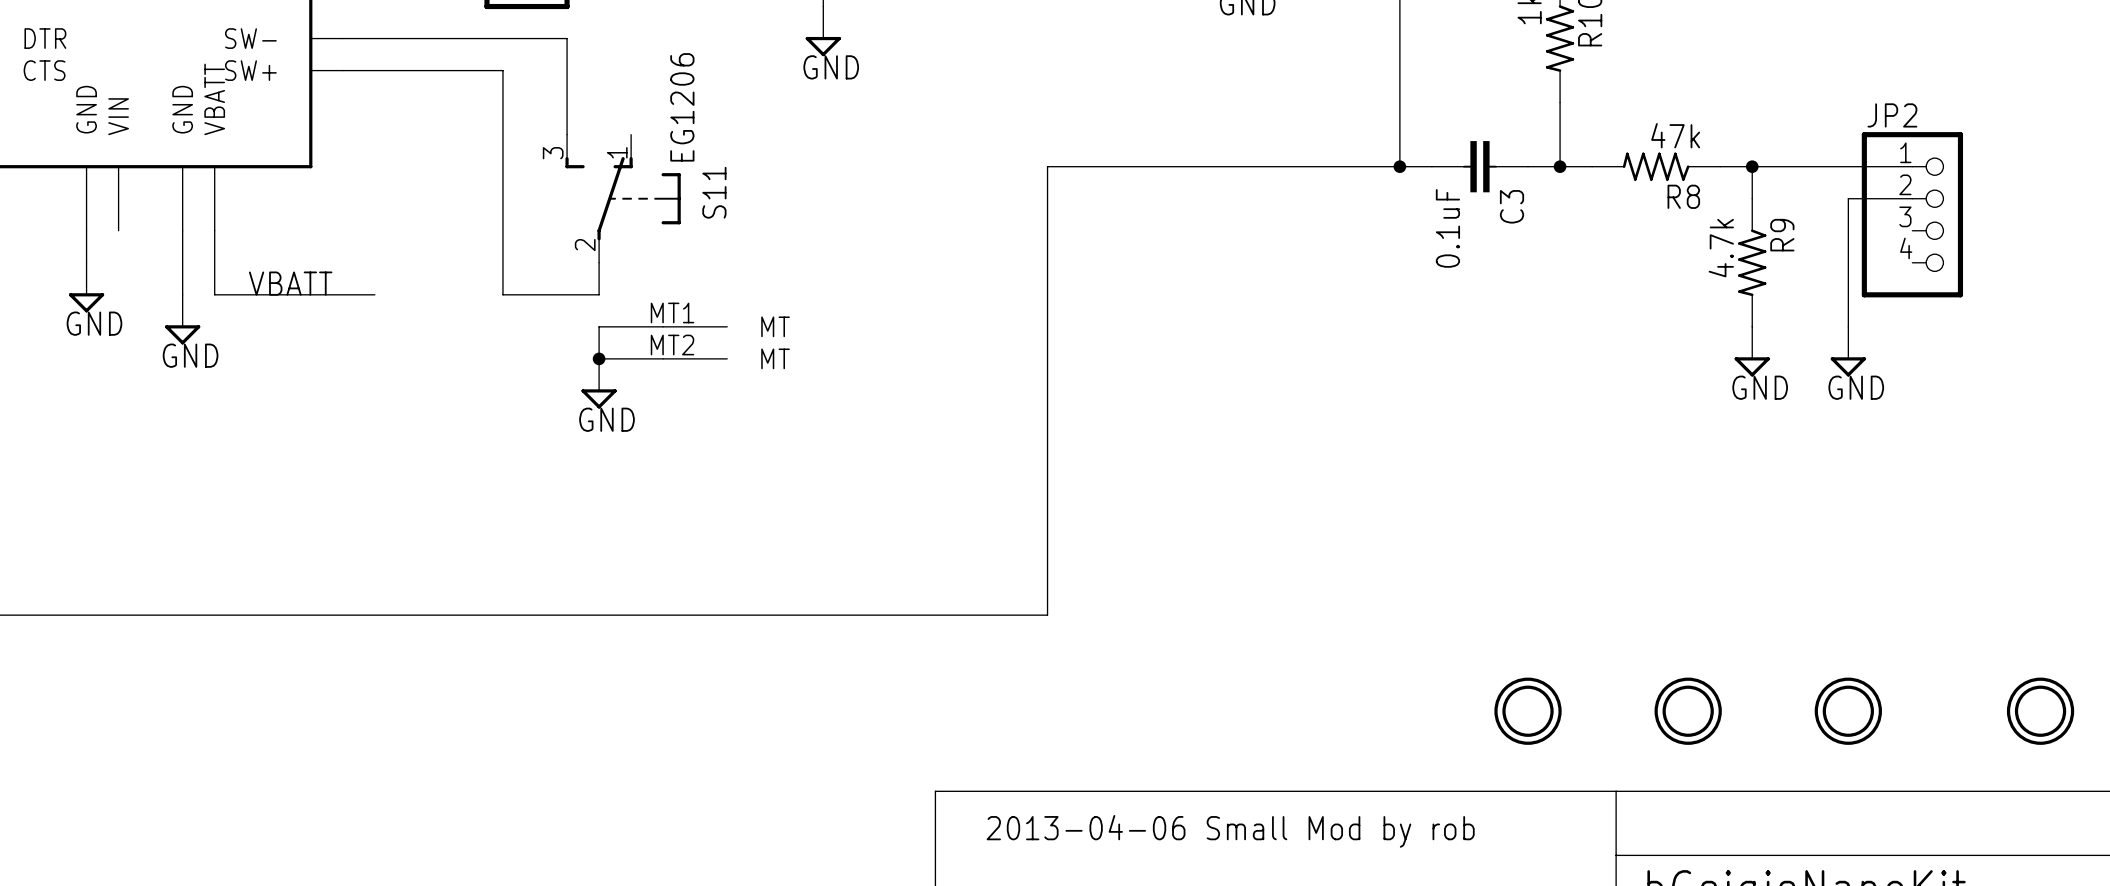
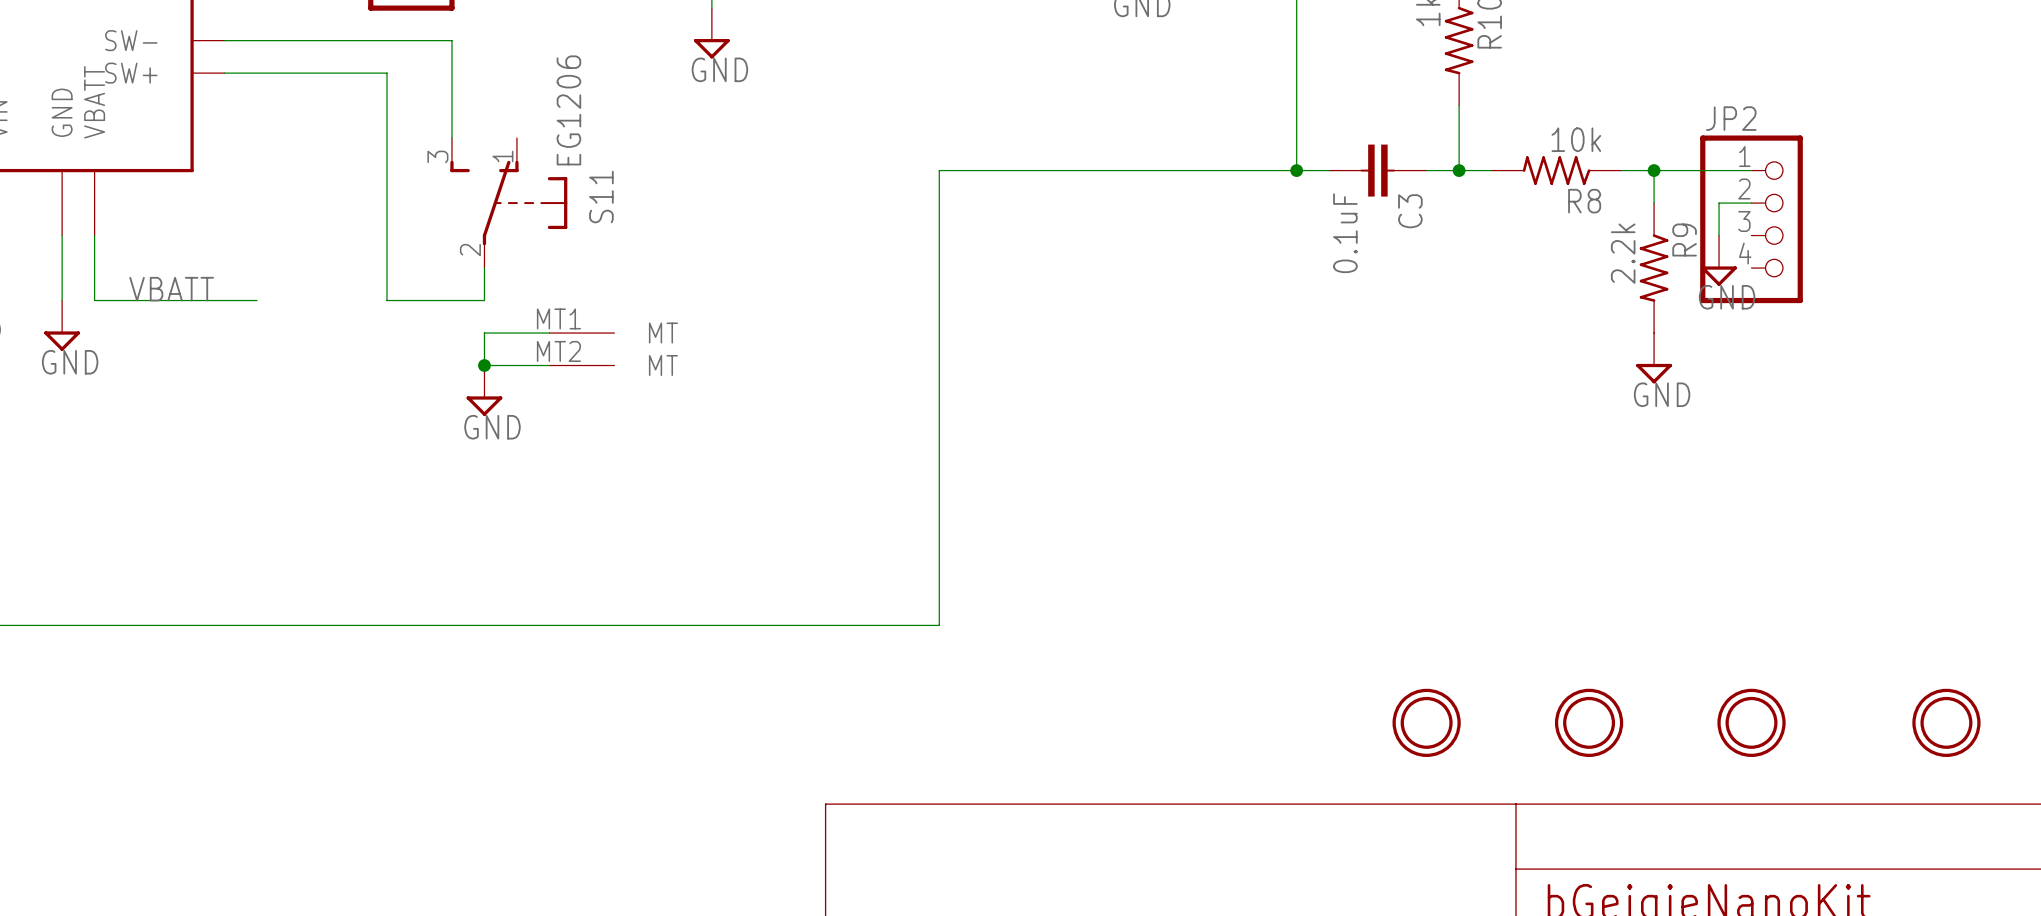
R8 value: 47k (1675, 135) -> 10k (1576, 139)
wire: (1848, 166) (1912, 166) -> none
wire: none -> (1751, 203) (1719, 203) (1719, 235)
wire: (1912, 198) (1848, 198) (1848, 326) -> none
JP2 position: (1912, 214) -> (1751, 219)
R9 value: 4.7k (1721, 248) -> 2.2k (1623, 253)
power symbol position: GND (1848, 351) -> GND (1719, 260)
text: 2013-04-06 Small Mod by rob (1230, 831) -> none

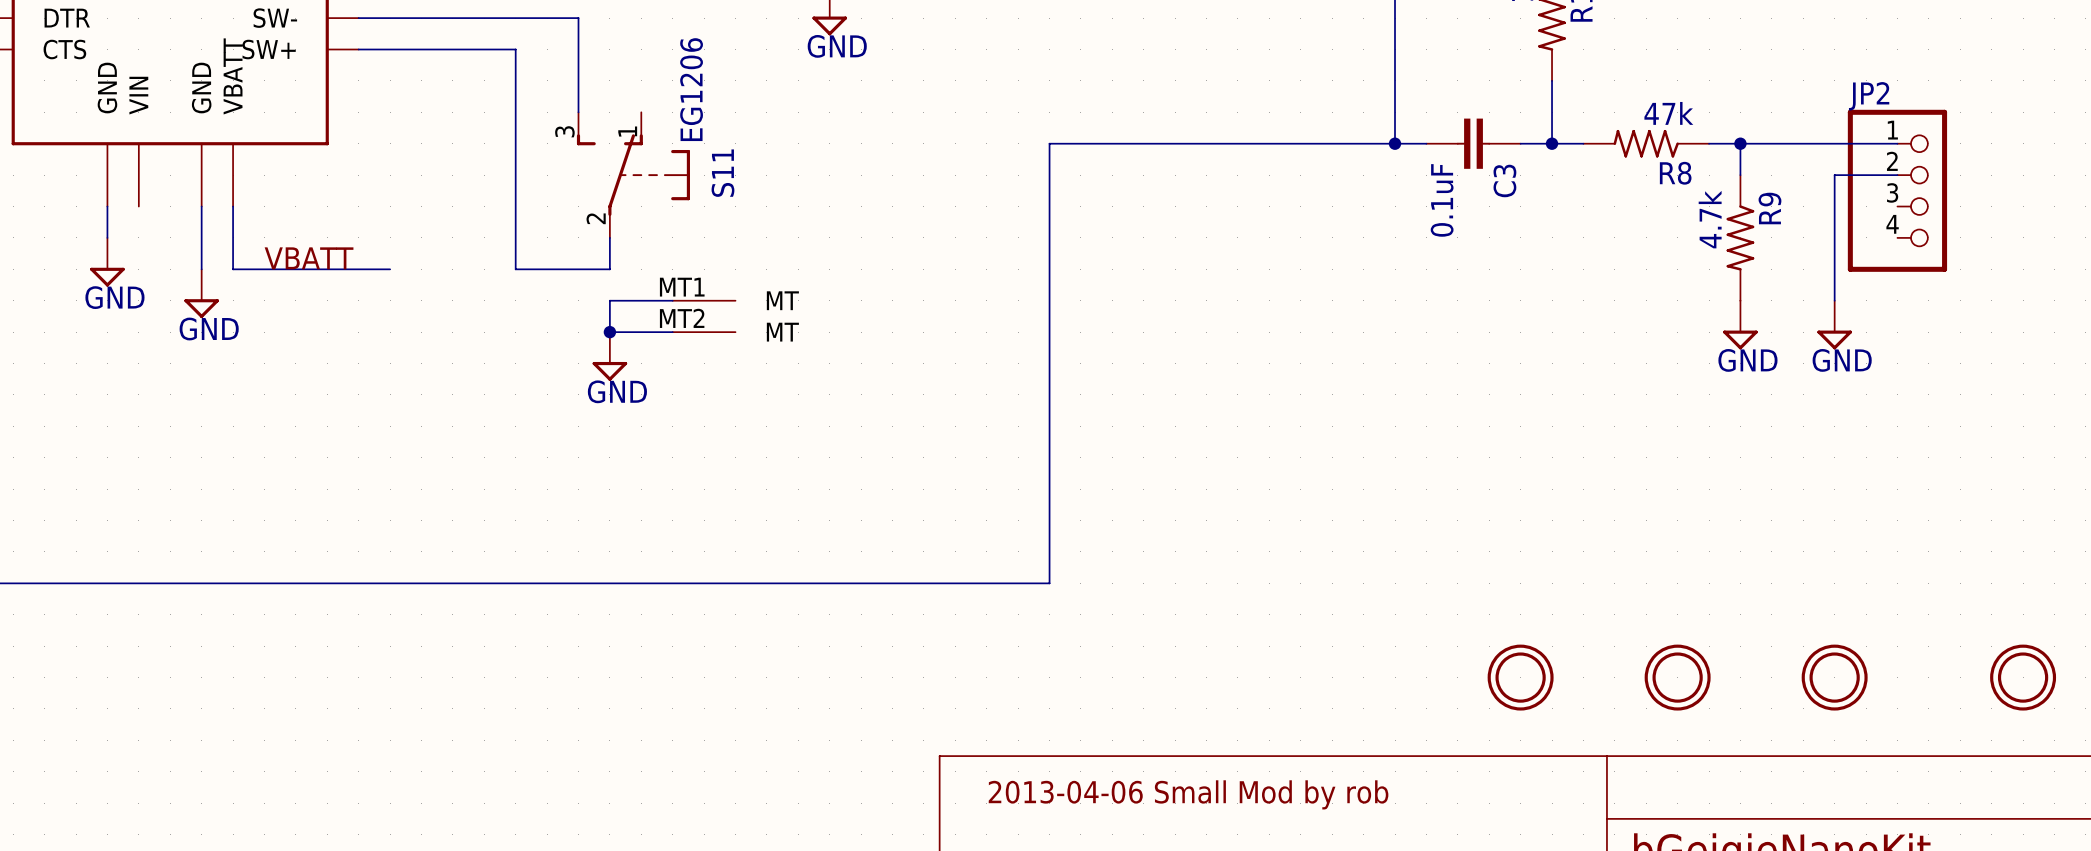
R8 value: 10k (1576, 139) -> 47k (1668, 113)
wire: none -> (1834, 143) (1897, 143)
wire: (1751, 203) (1719, 203) (1719, 235) -> none
wire: none -> (1897, 175) (1834, 175) (1834, 300)
JP2 position: (1751, 219) -> (1897, 190)
R9 value: 2.2k (1623, 253) -> 4.7k (1710, 219)
power symbol position: GND (1719, 260) -> GND (1834, 325)
text: none -> 2013-04-06 Small Mod by rob (1188, 794)

